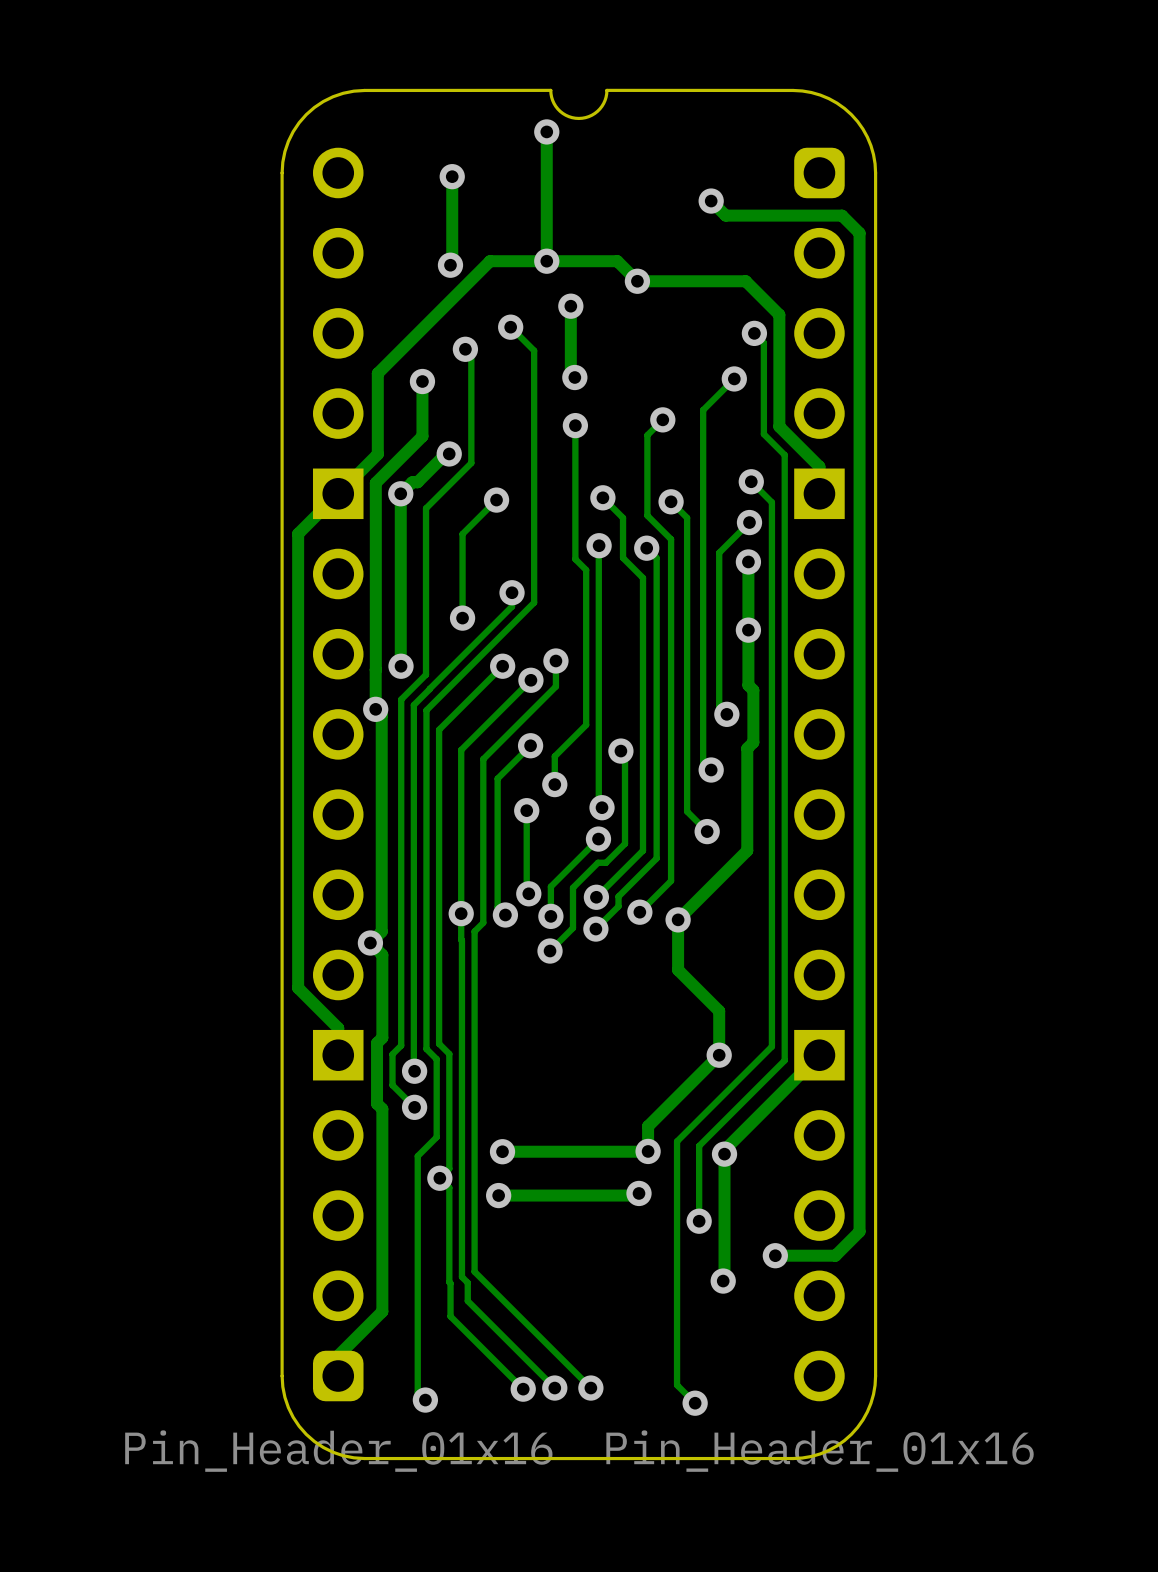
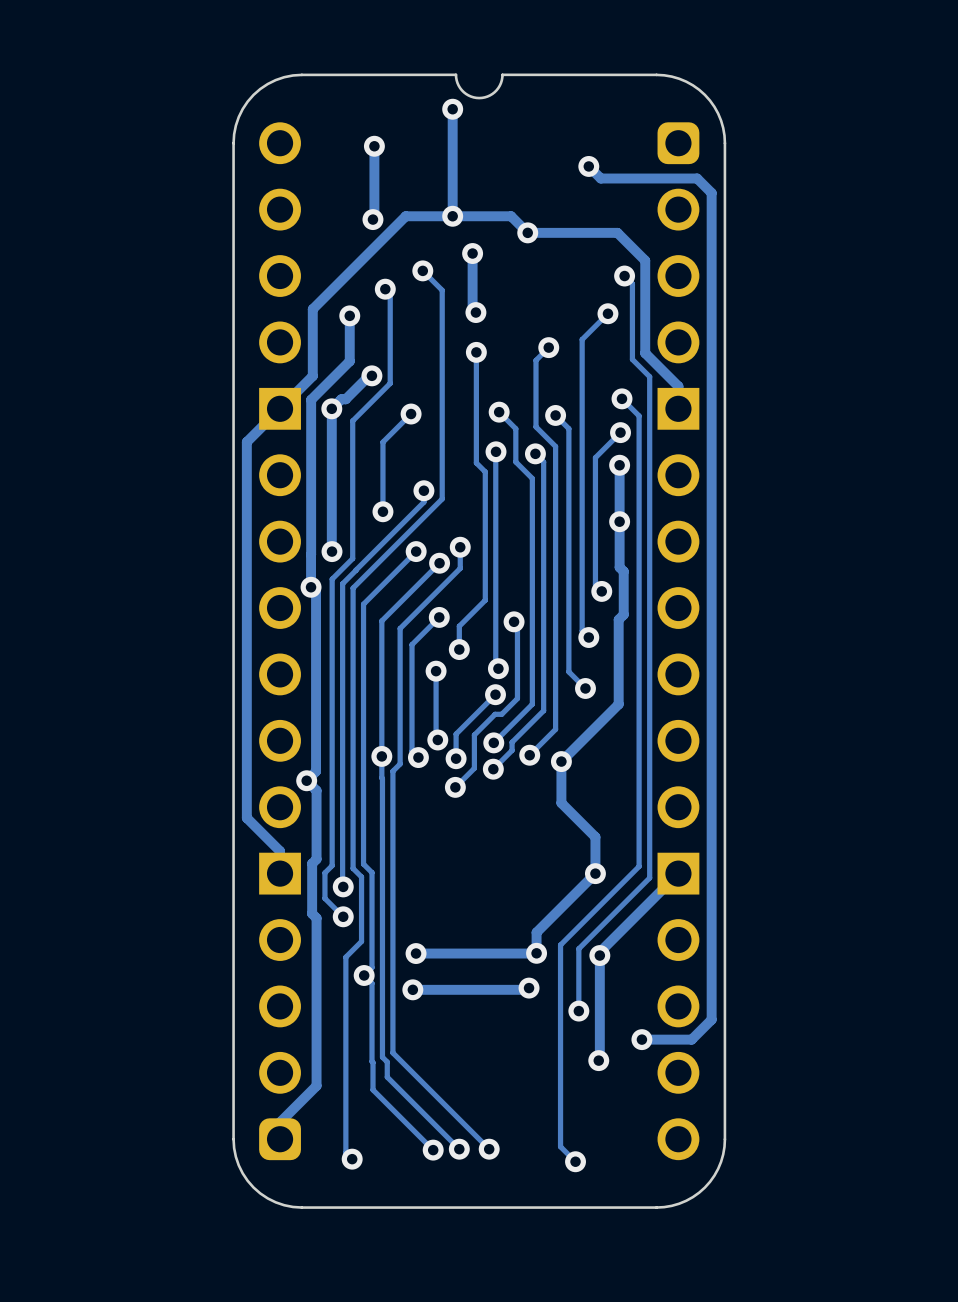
drawing: [125, 1430, 1034, 1472] -> none

